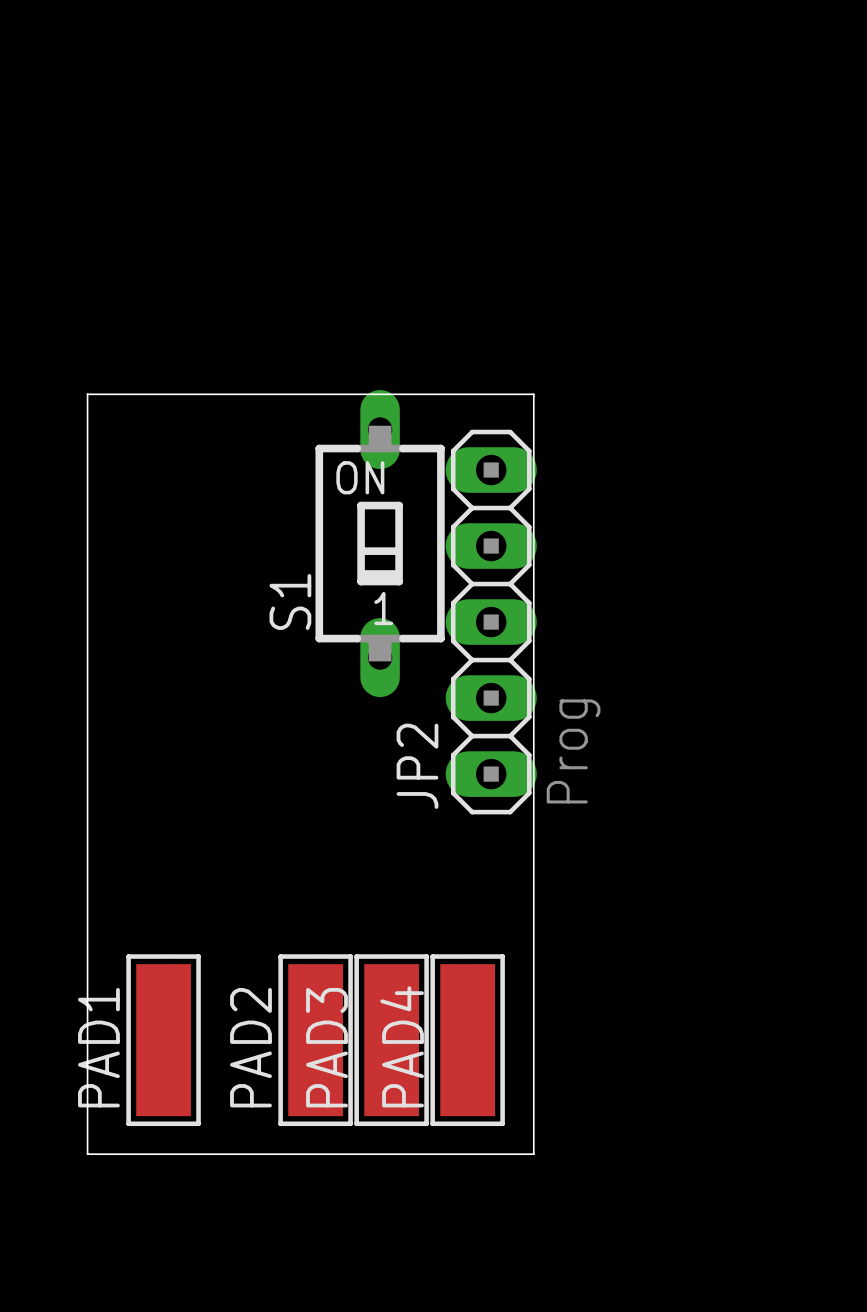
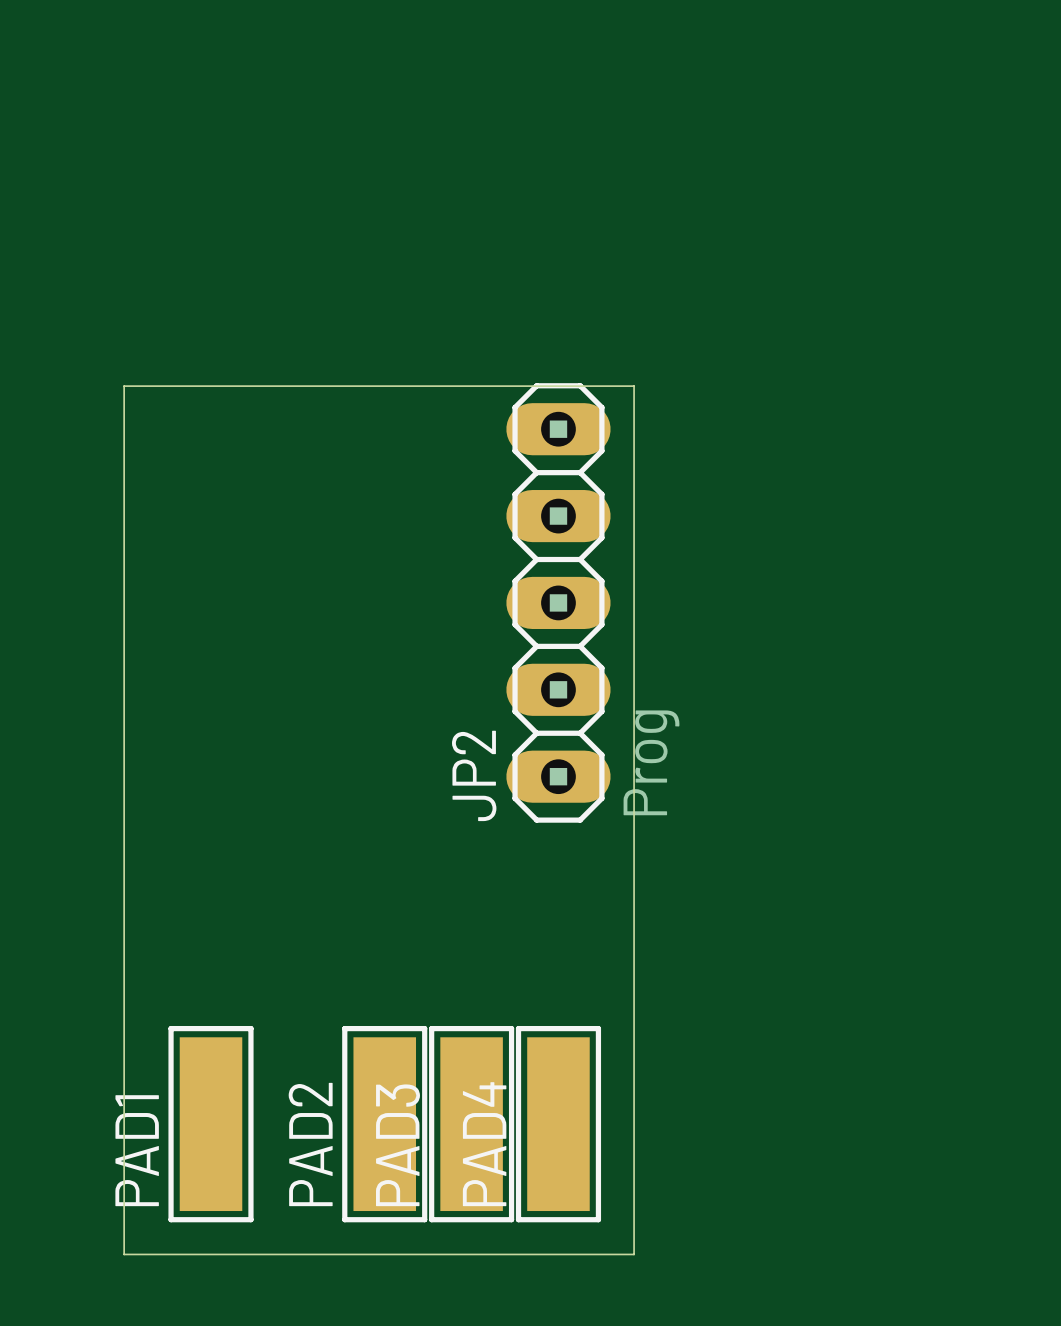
S1: (380, 543) -> none
JP2 position: (491, 622) -> (558, 602)

